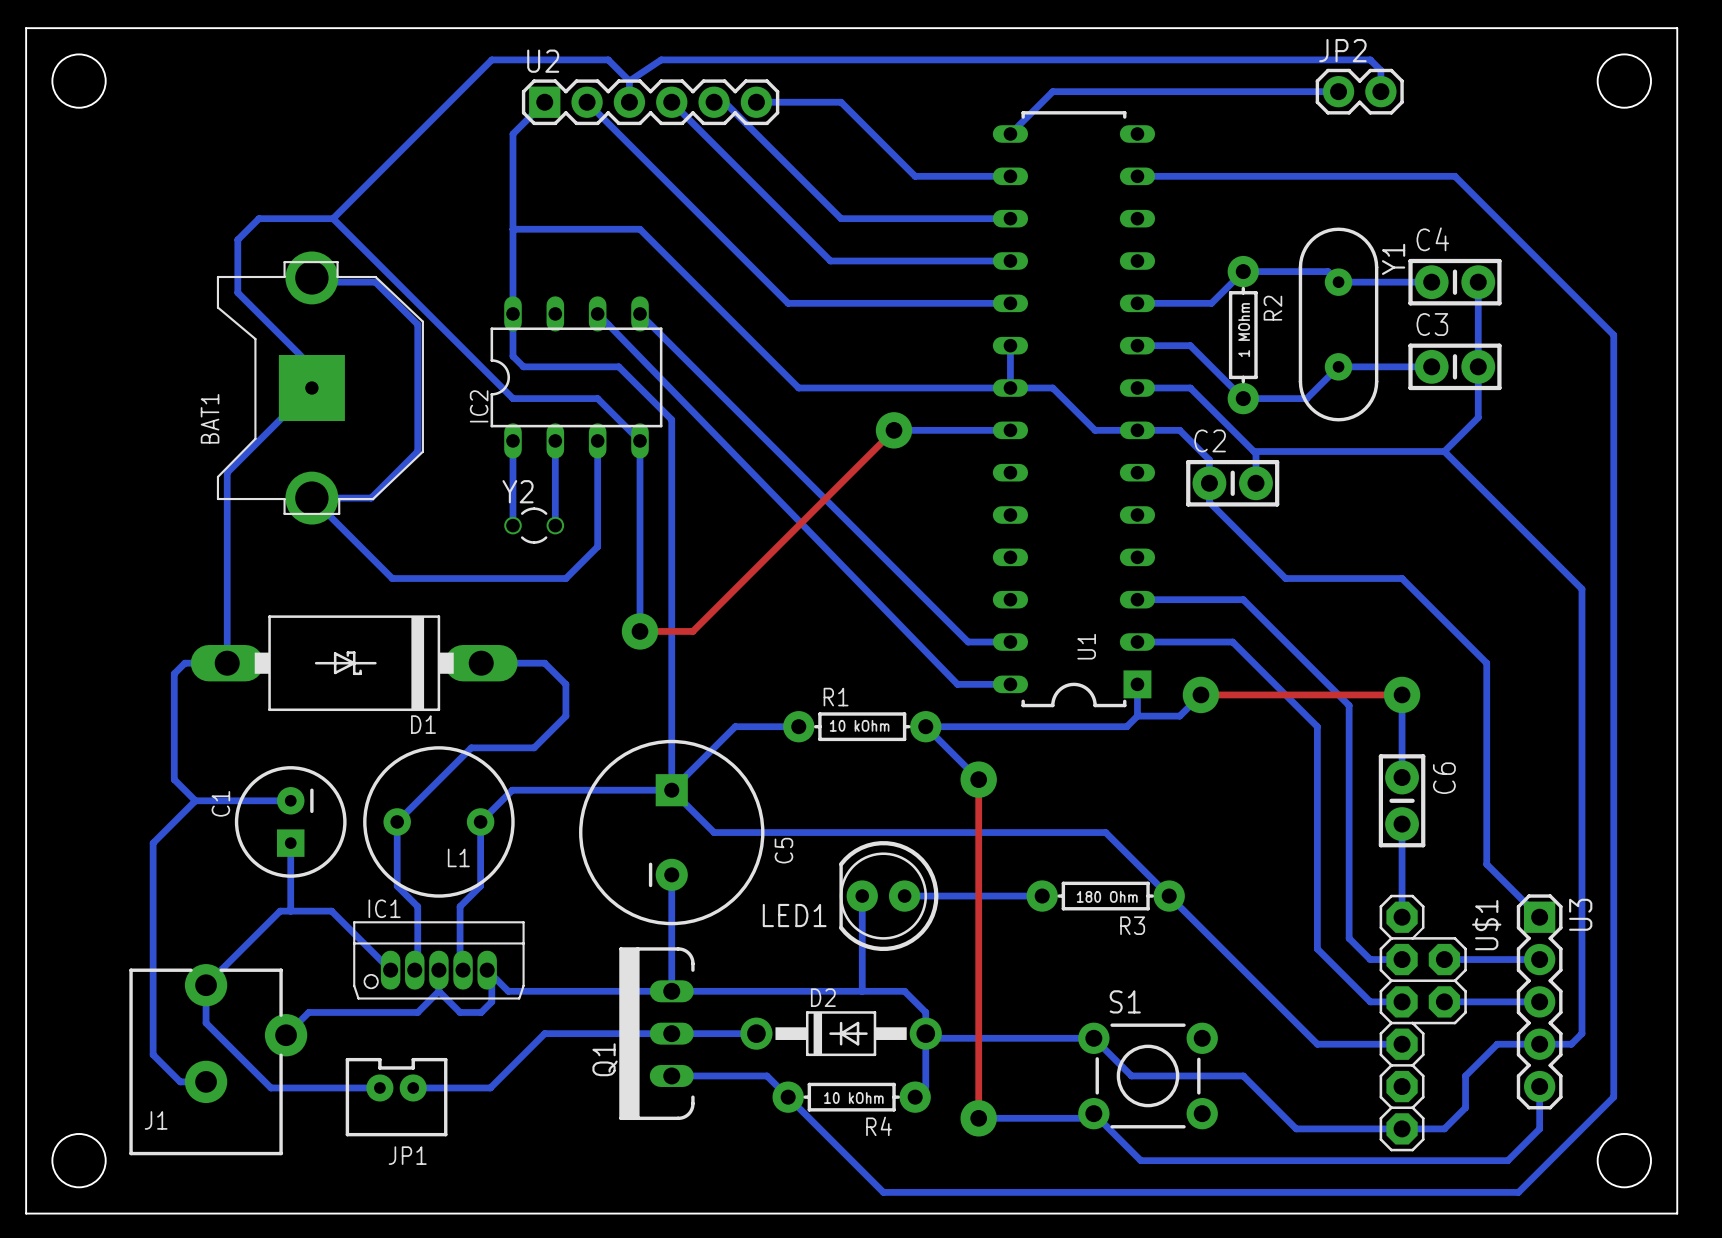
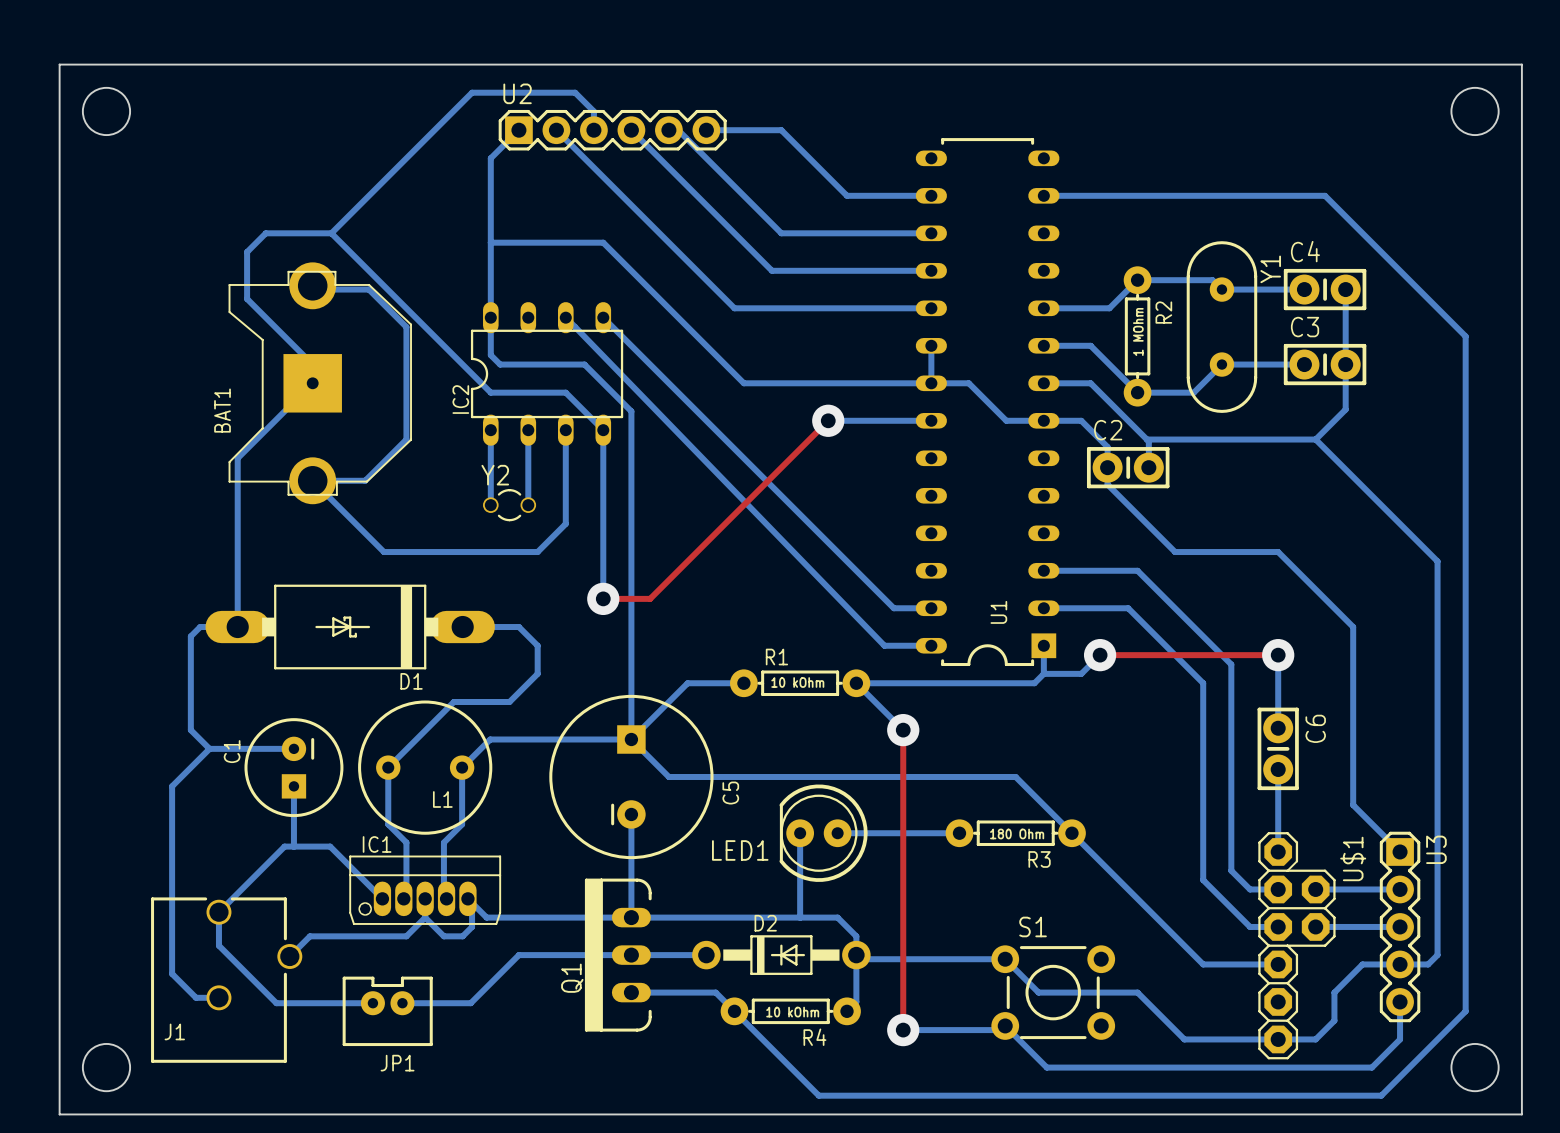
bottom track: (629, 81) (661, 59) (1370, 59) (1380, 70) (1380, 91) -> none
bottom track: (1338, 91) (1052, 91) (1010, 133) -> none
JP2: (1359, 91) -> none
J1 footprint: [129, 964, 308, 1156] -> [151, 897, 303, 1063]

